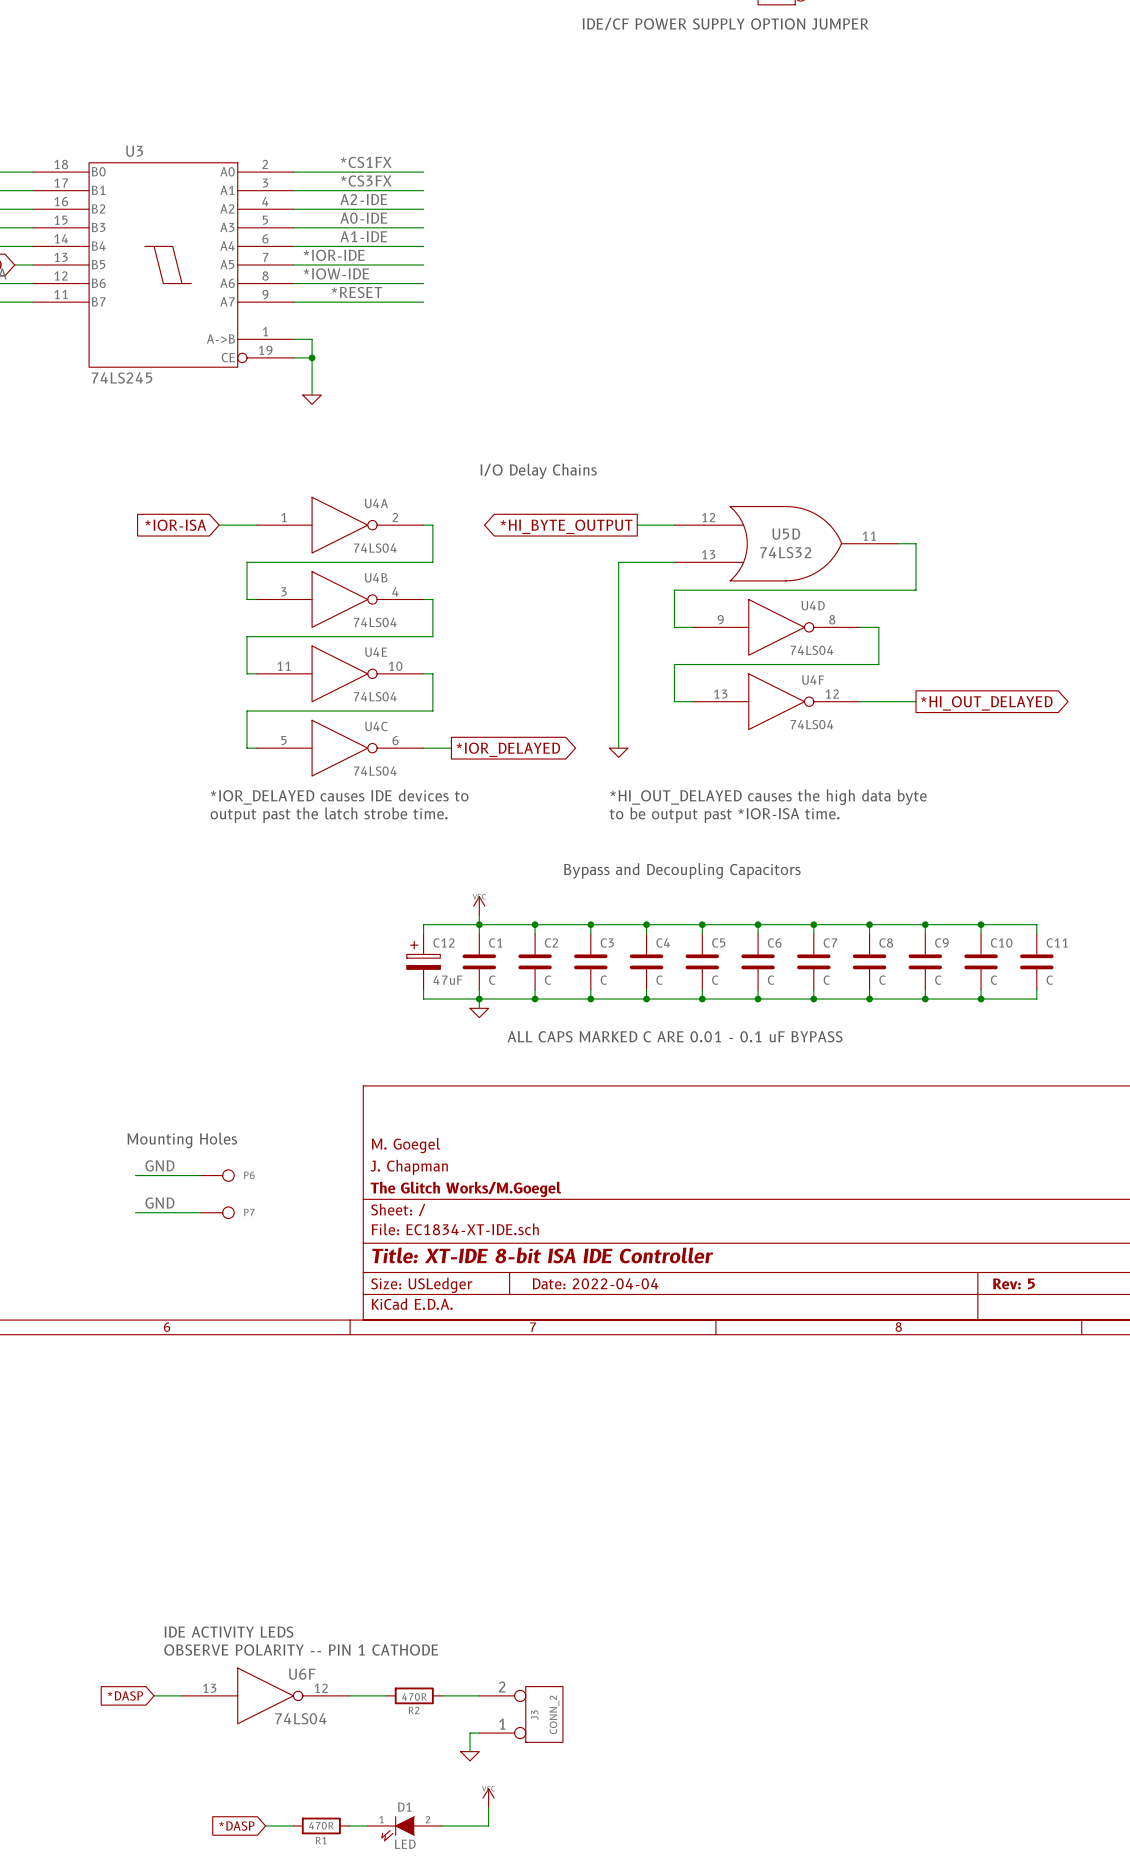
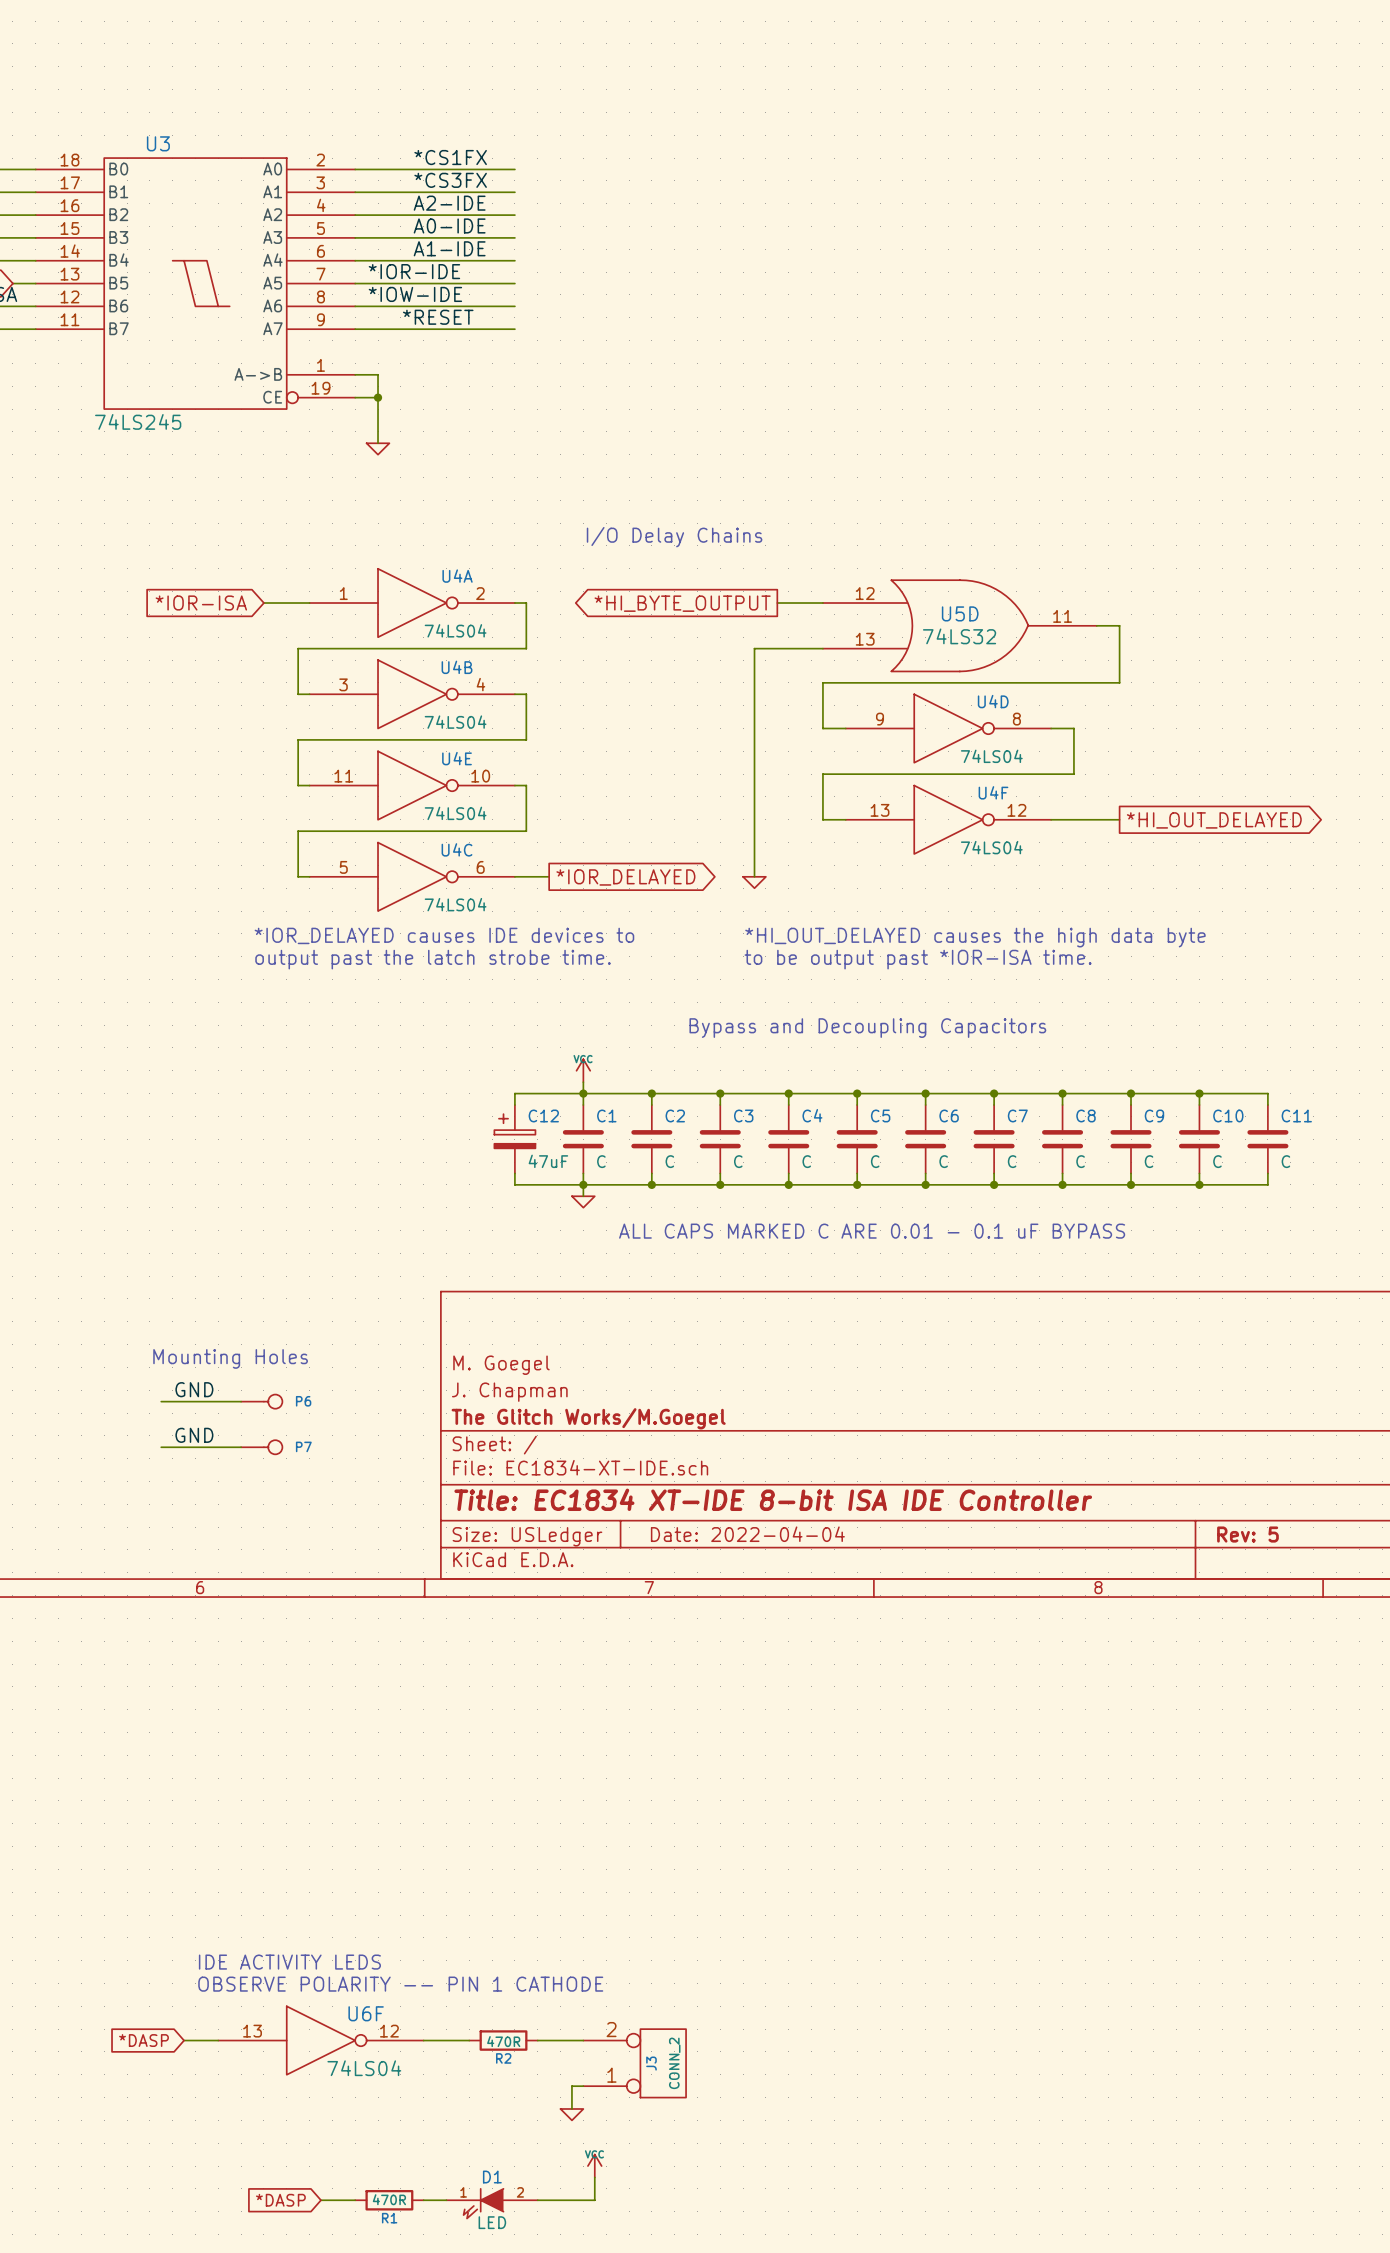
title block: Title: XT-IDE 8-bit ISA IDE Controller (542, 1255) -> Title: EC1834 XT-IDE 8-bit ISA IDE Controller (773, 1499)

